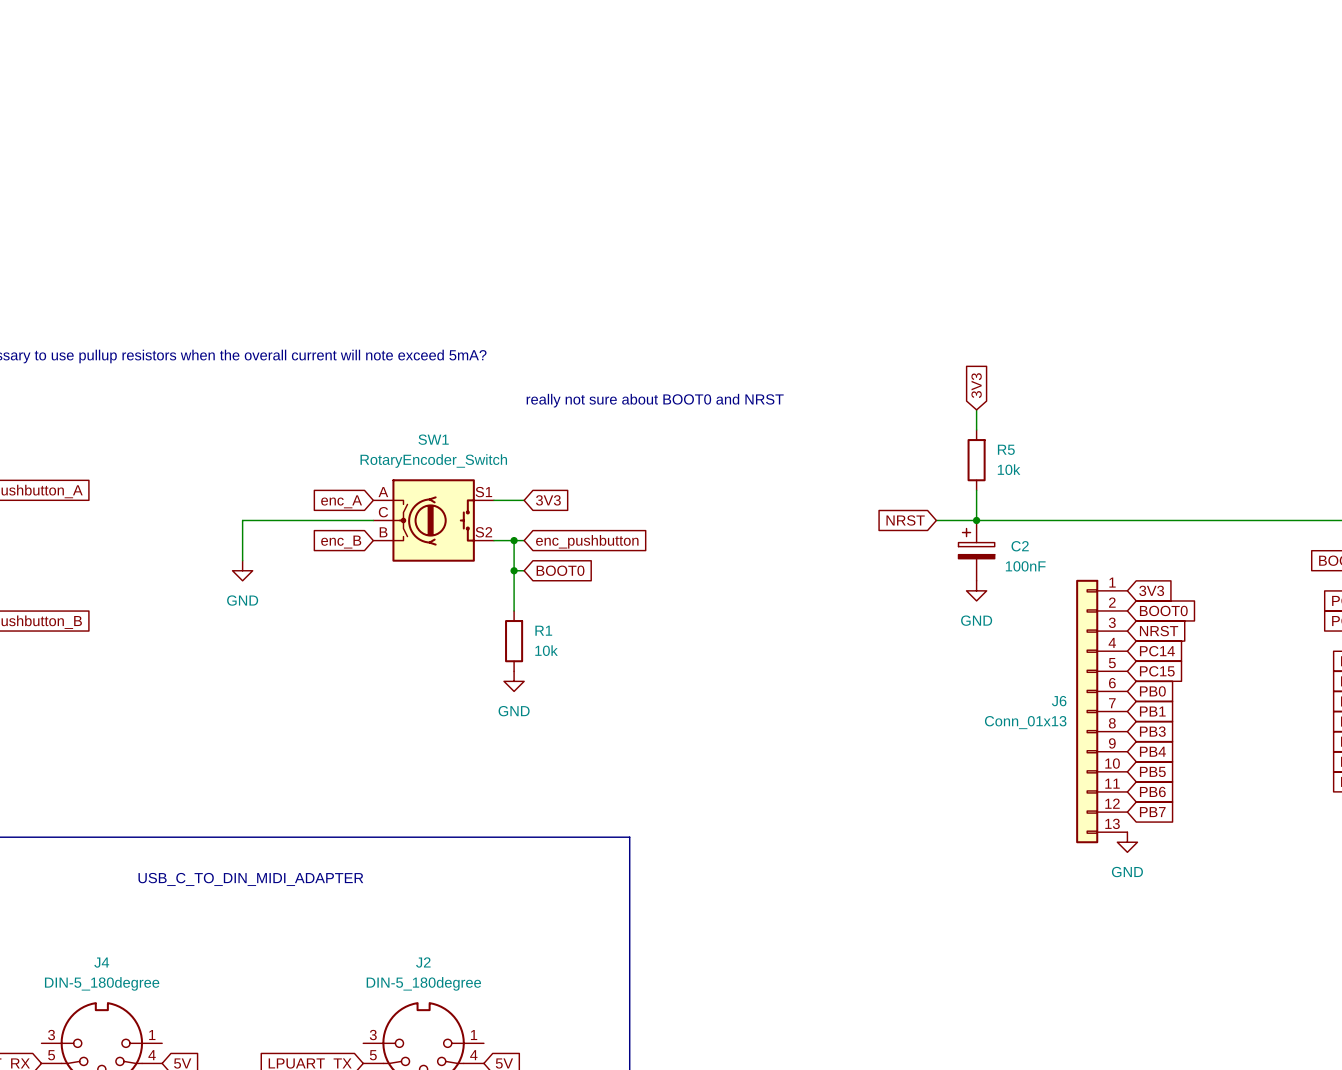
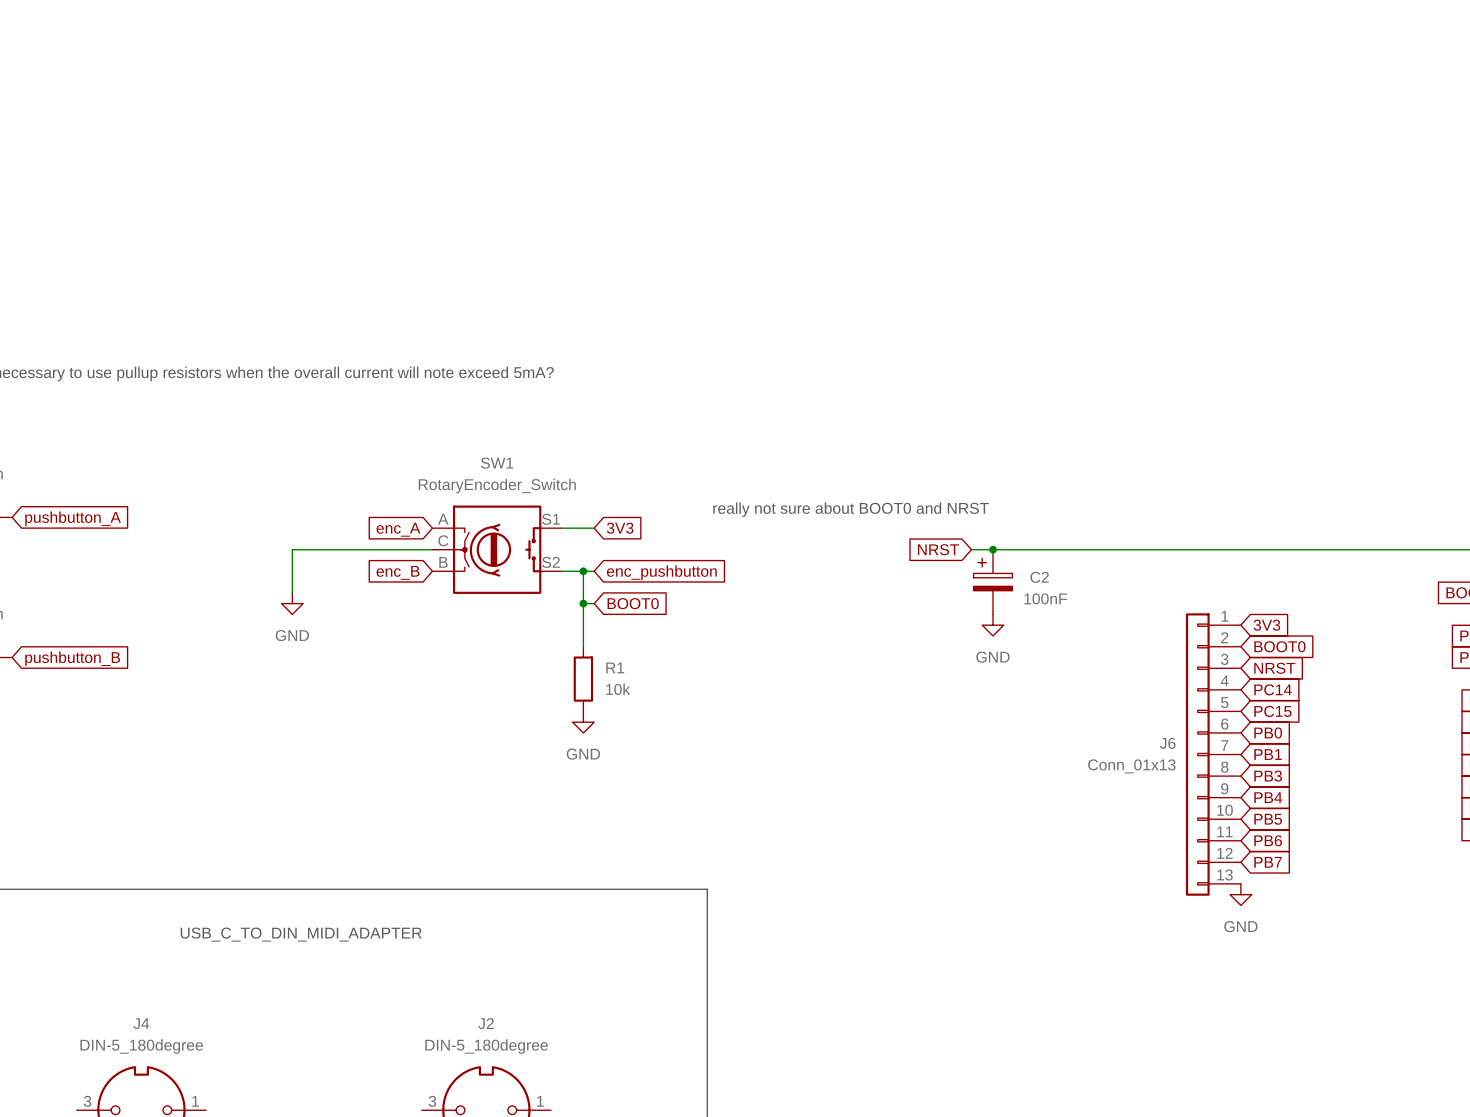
global label: 3V3 (976, 385) -> none
text position: really not sure about BOOT0 and NRST (655, 400) -> really not sure about BOOT0 and NRST (851, 509)
wire: (976, 409) (976, 429) -> none
R5: 10k (976, 460) -> none
wire: (976, 490) (976, 520) -> none
wire: none -> (971, 549) (1036, 549)
junction: none -> (992, 549)
global label position: NRST (905, 520) -> NRST (938, 549)
junction: (976, 520) -> none
C2 position: (976, 550) -> (992, 582)
power symbol position: GND (976, 590) -> GND (992, 625)

